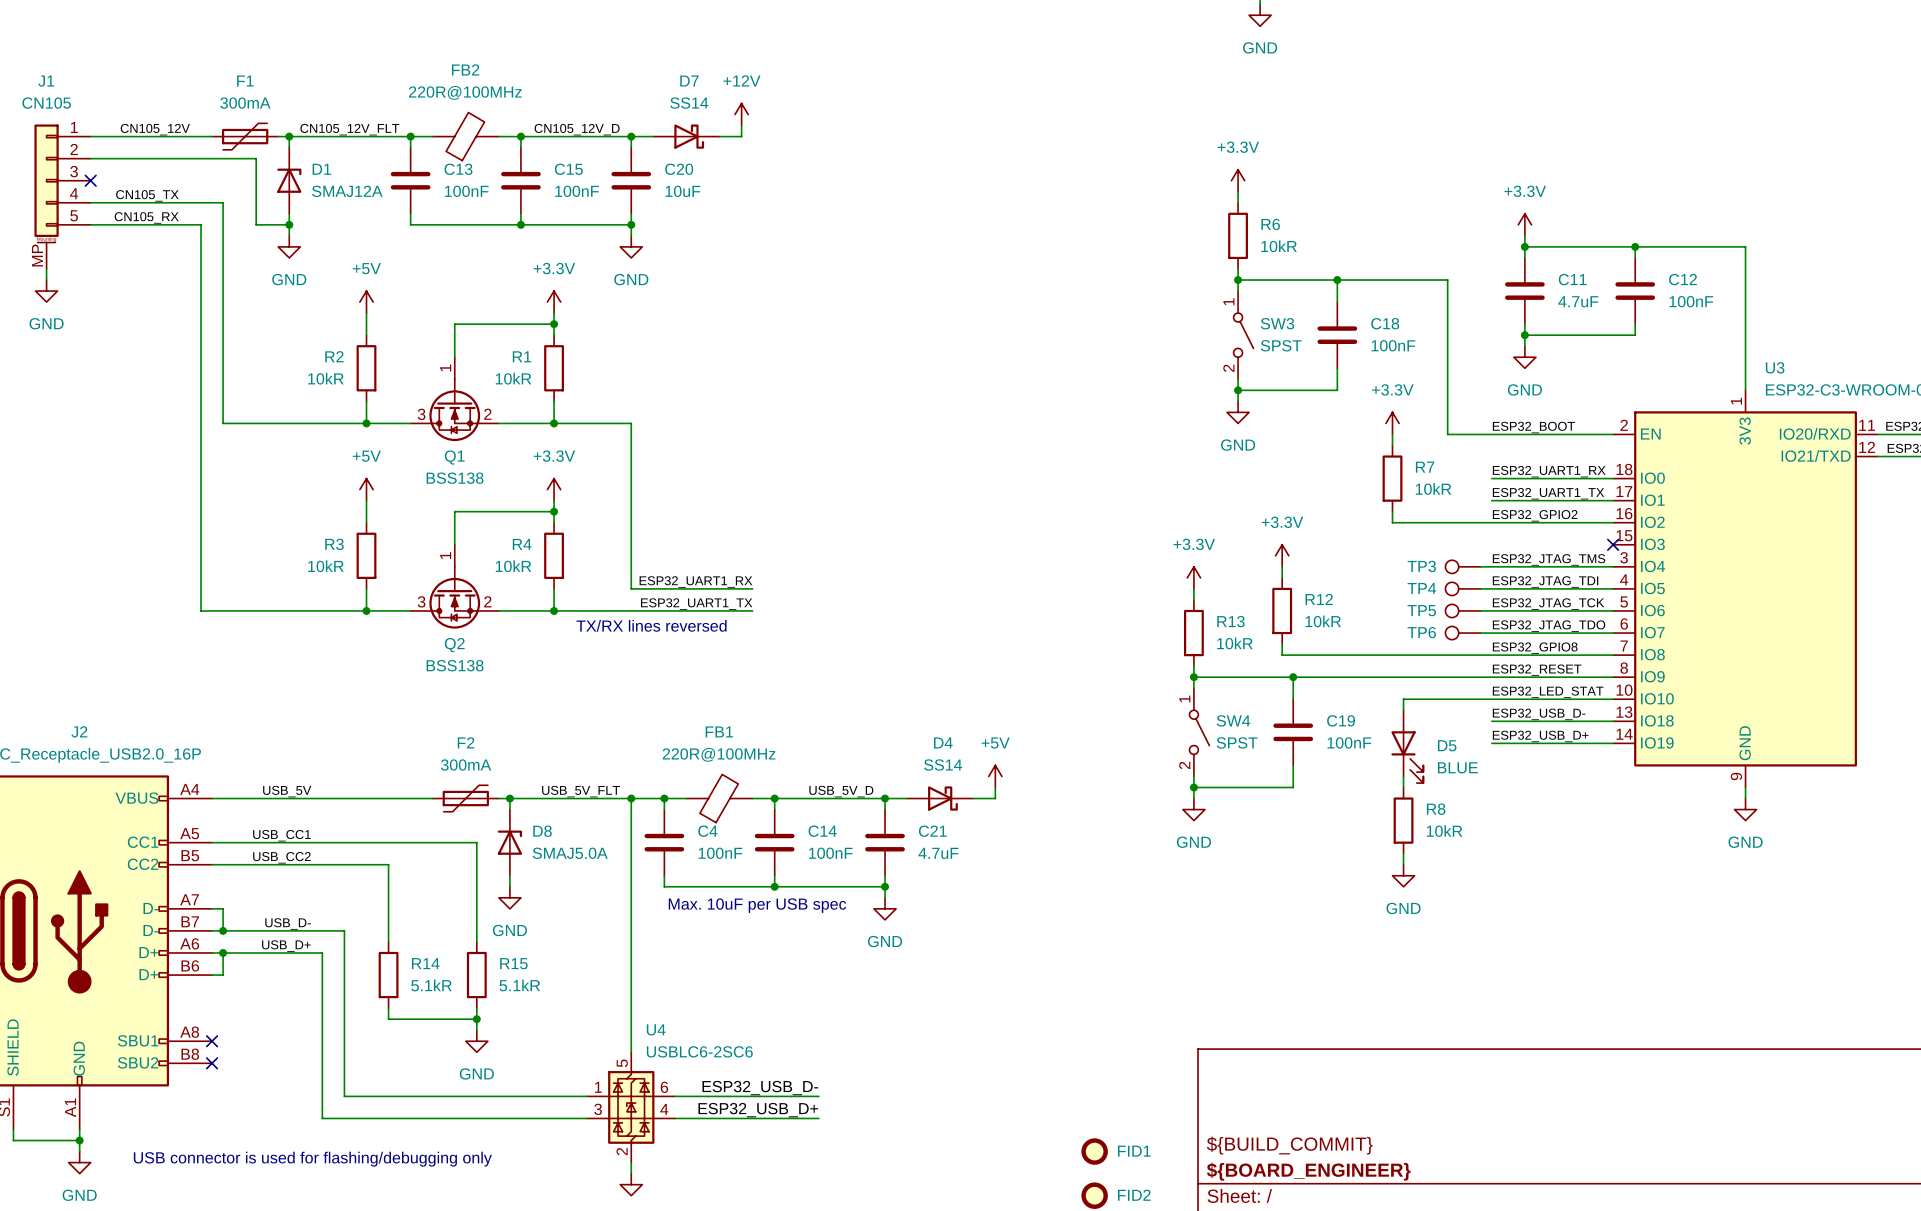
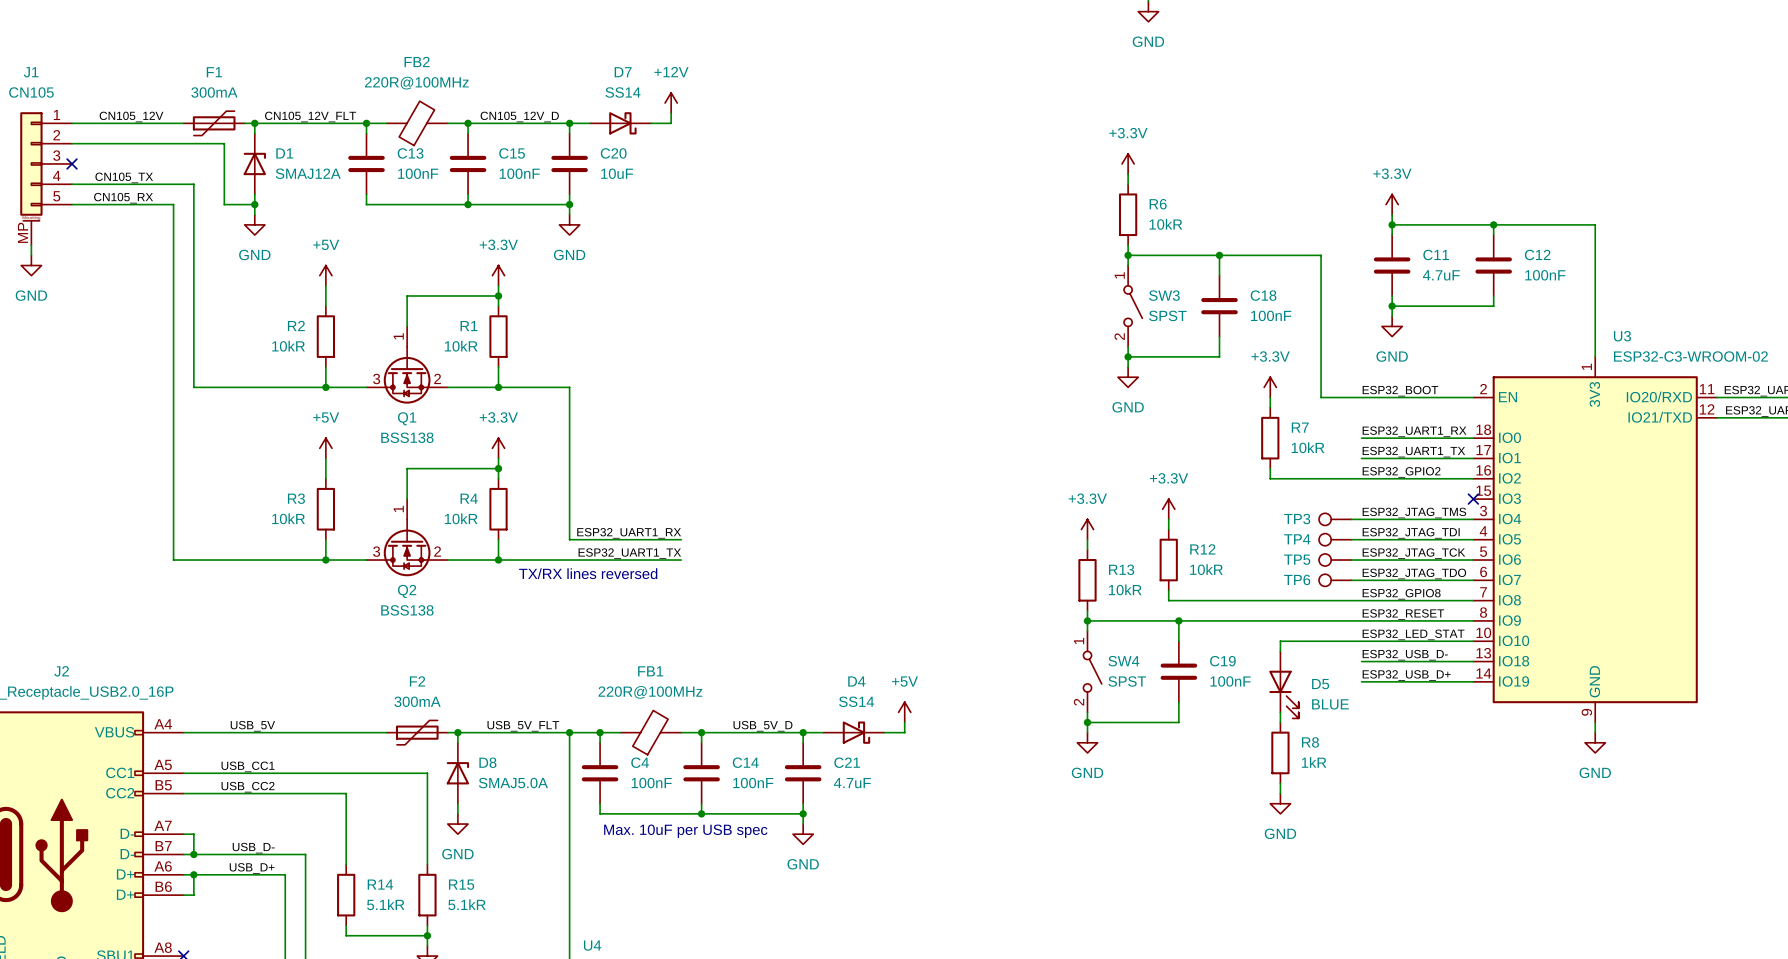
R8 value: 10kR (1444, 831) -> 1kR (1314, 762)

